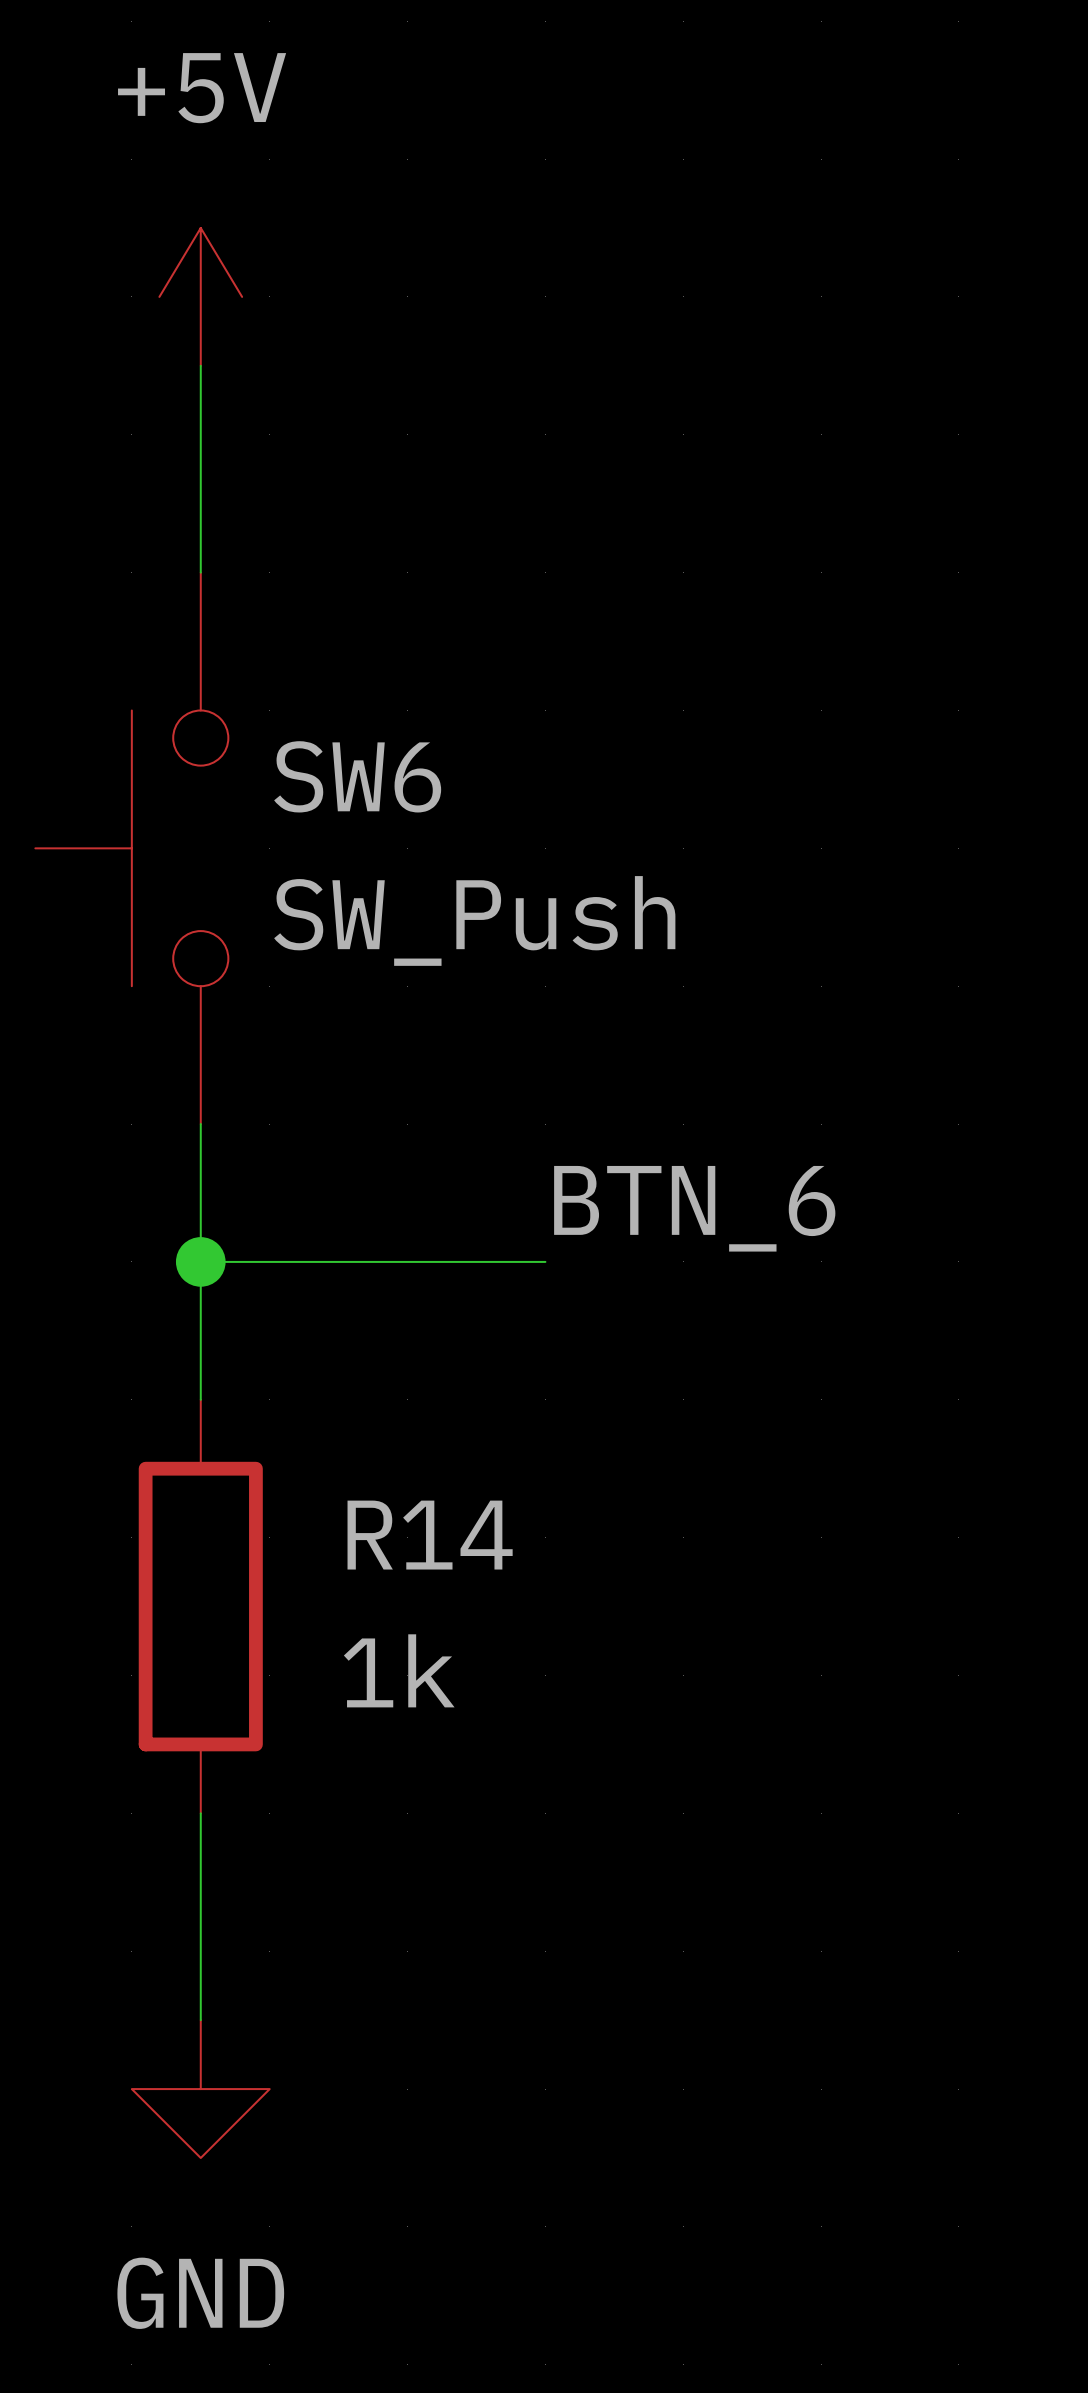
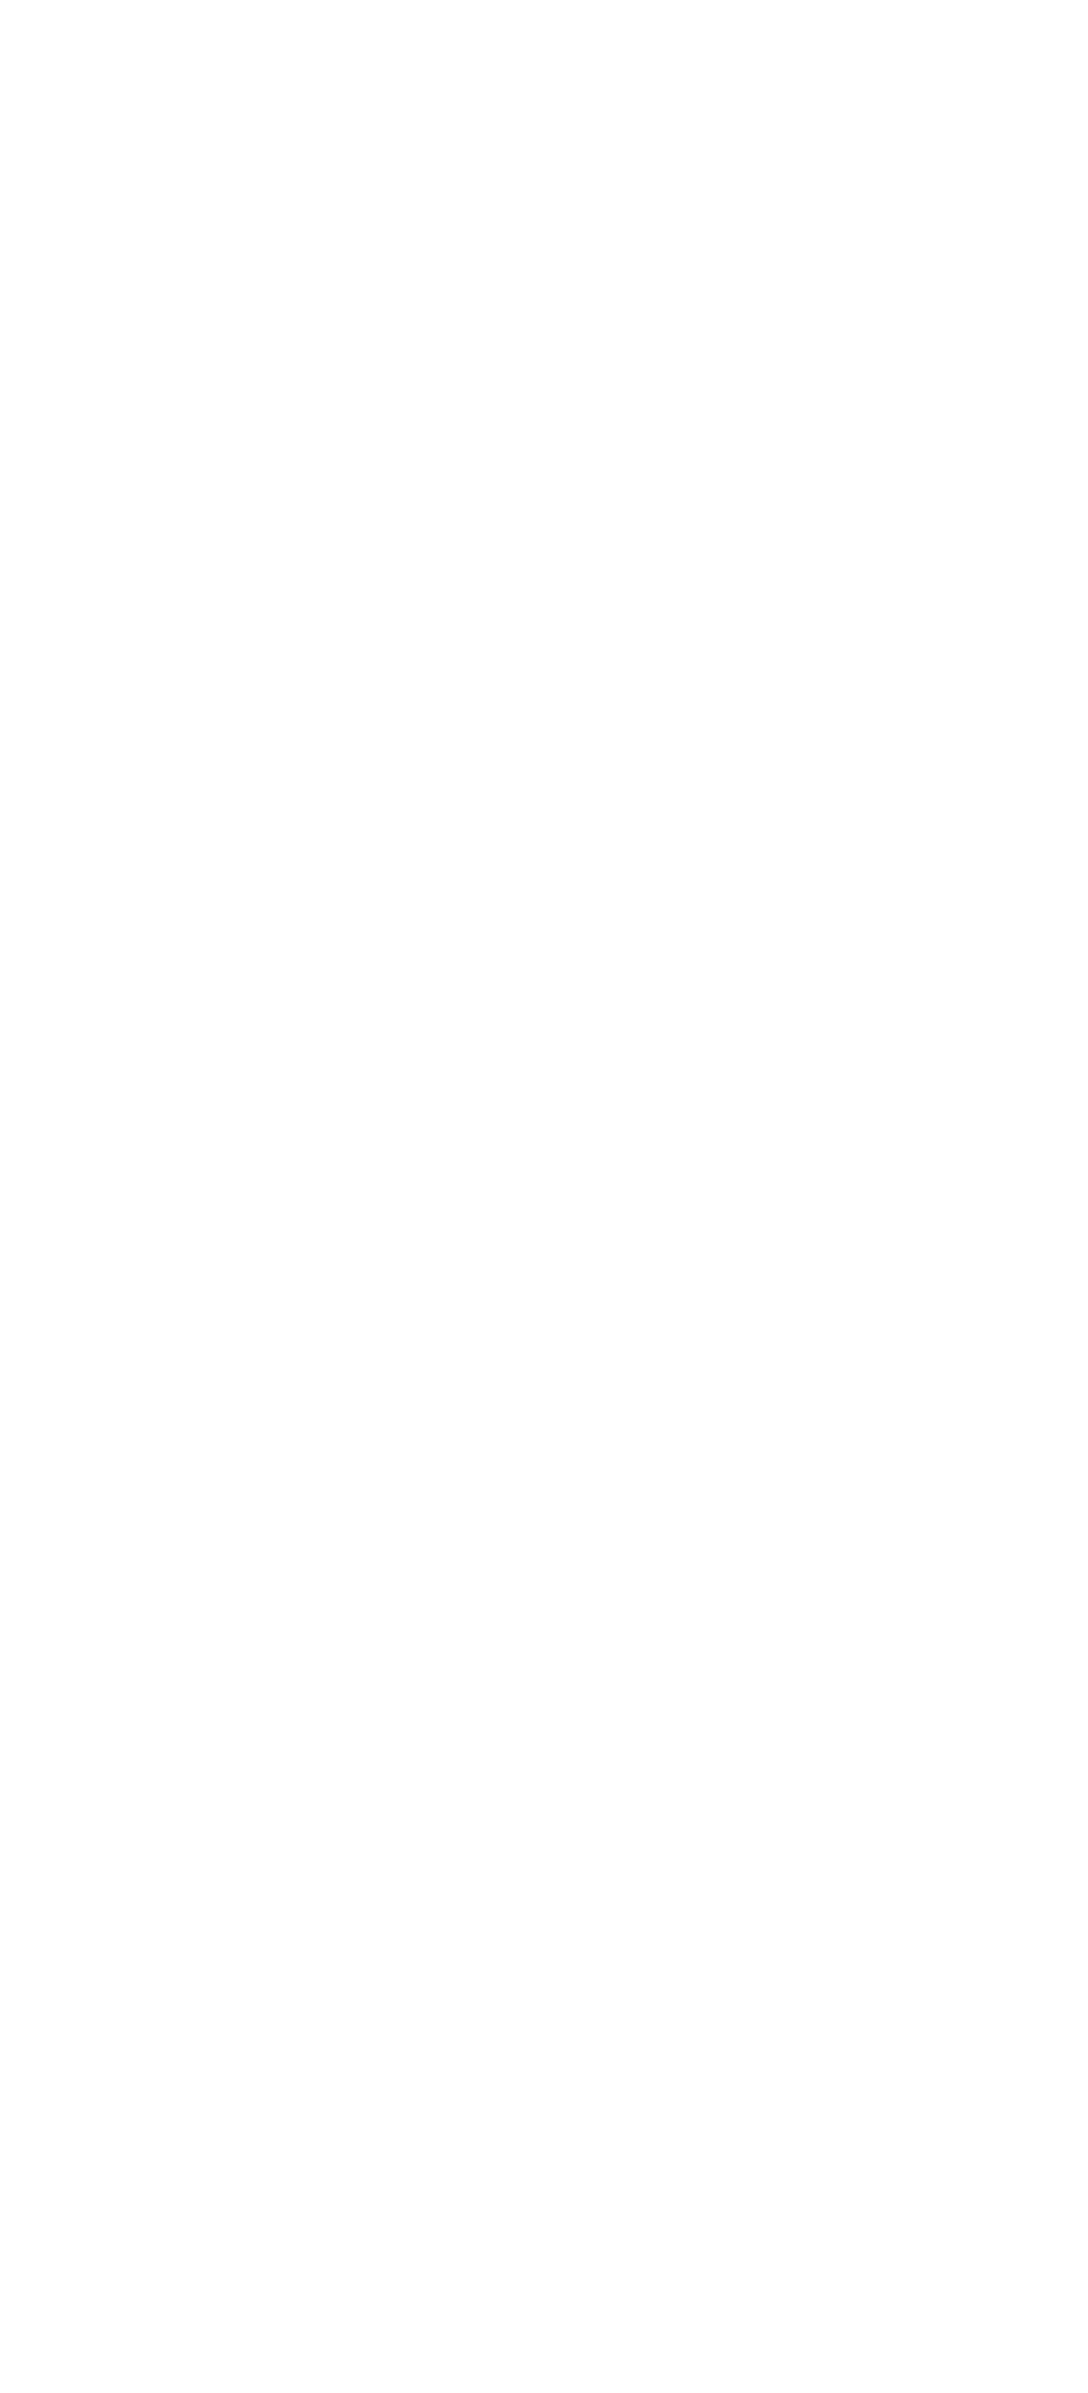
power symbol: +5V (200, 296) -> none
wire: (200, 365) (200, 572) -> none
SW6: SW_Push (131, 848) -> none
wire: (200, 1124) (200, 1399) -> none
label: BTN_6 (694, 1208) -> none
wire: (200, 1261) (545, 1261) -> none
junction: (200, 1261) -> none
R14: 1k (200, 1606) -> none
wire: (200, 1813) (200, 2020) -> none
power symbol: GND (200, 2089) -> none

